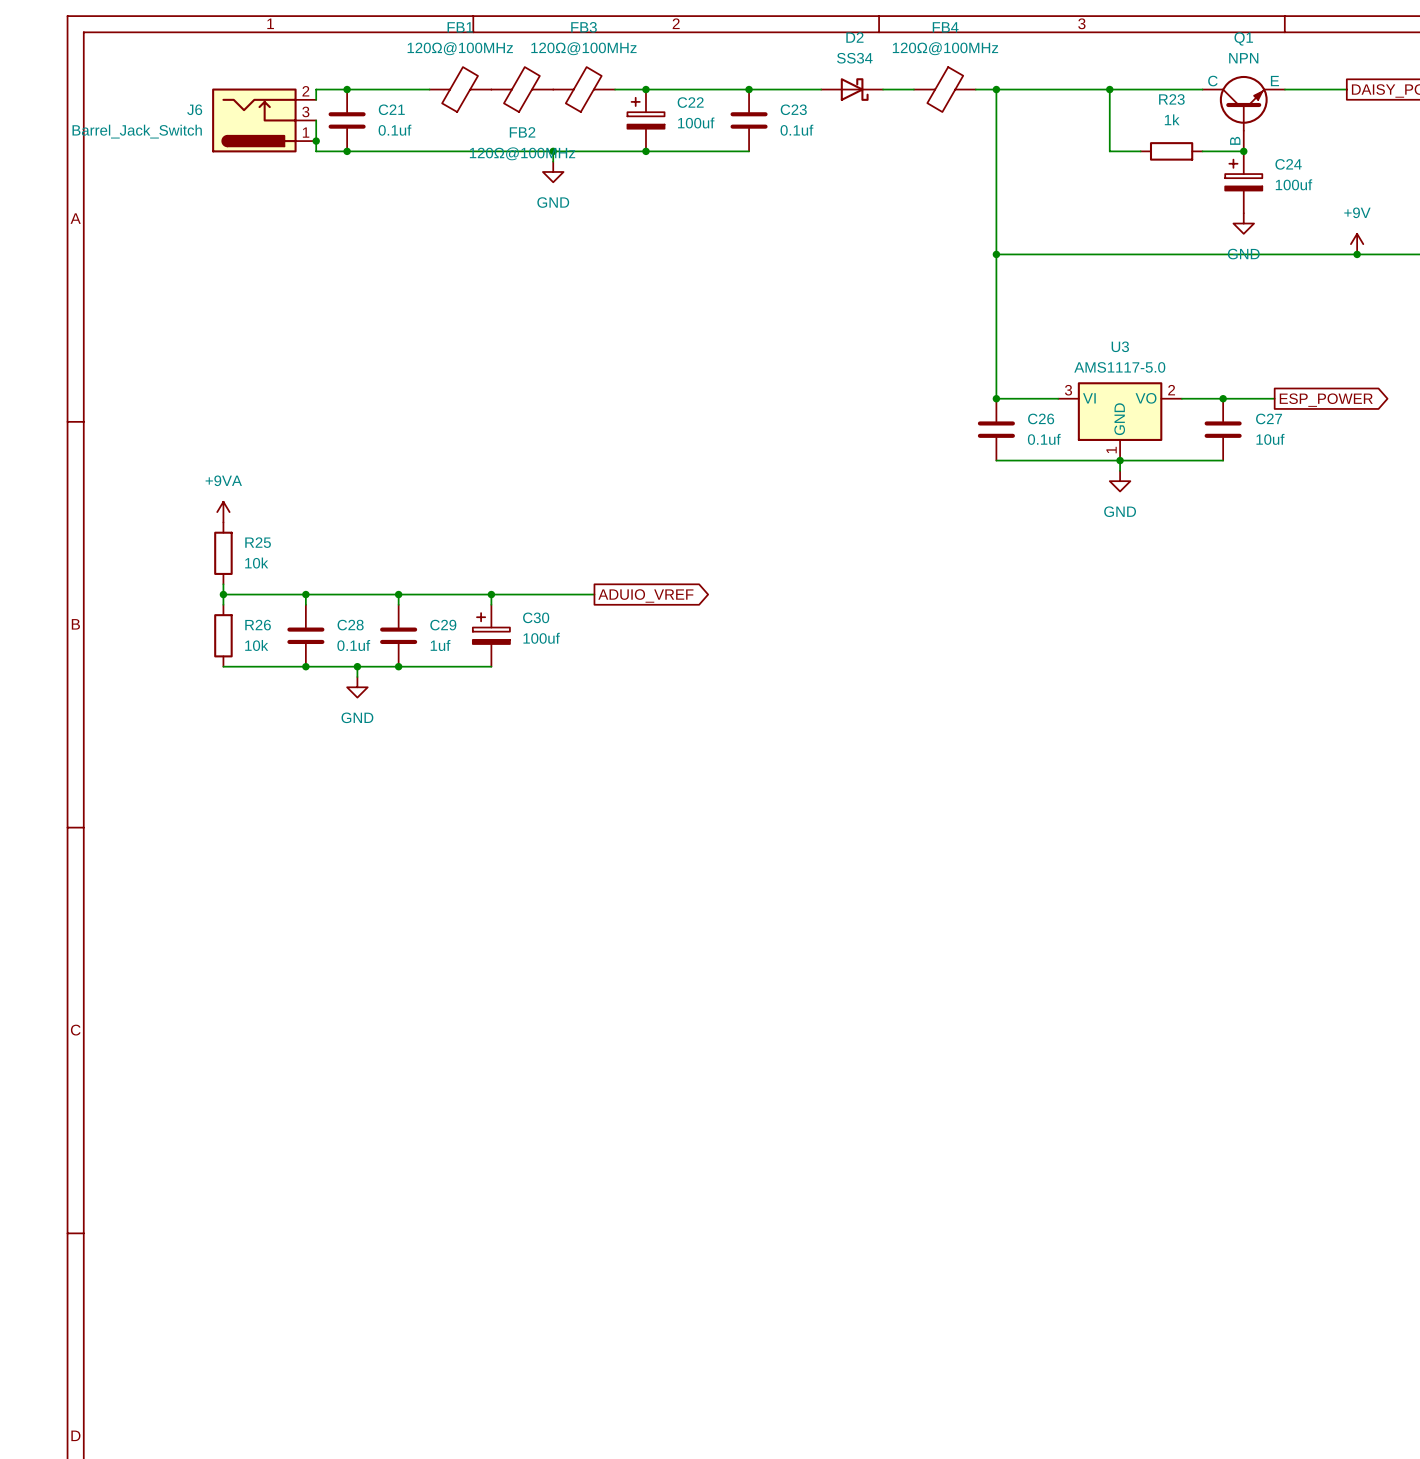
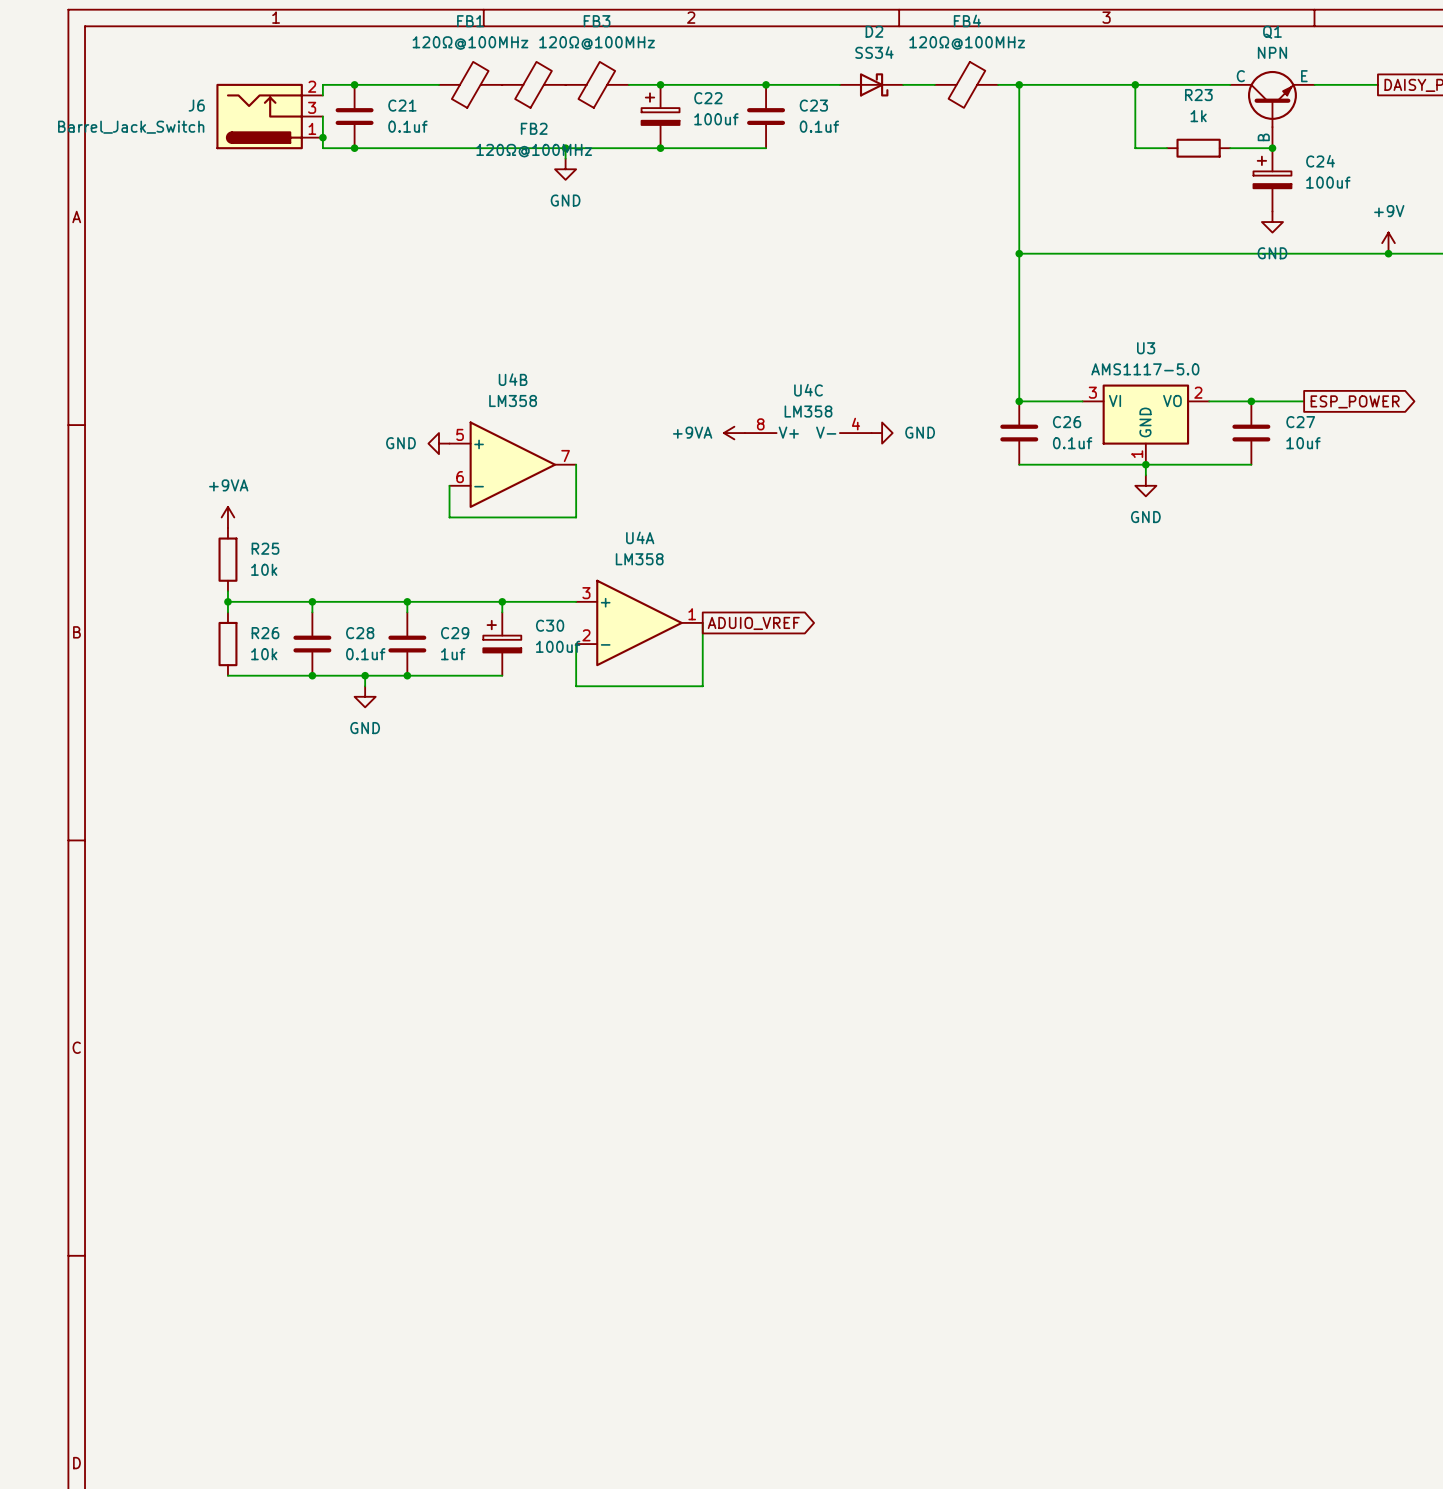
power symbol: none -> +9VA (734, 433)
U4C: none -> LM358 (808, 433)
power symbol: none -> GND (882, 433)
power symbol: none -> GND (438, 443)
U4B: none -> LM358 (512, 464)
wire: none -> (576, 464) (576, 517) (449, 517) (449, 485)
global label position: ADUIO_VREF (645, 595) -> ADUIO_VREF (753, 623)
U4A: none -> LM358 (639, 622)
wire: none -> (702, 622) (702, 686) (576, 686) (576, 644)

